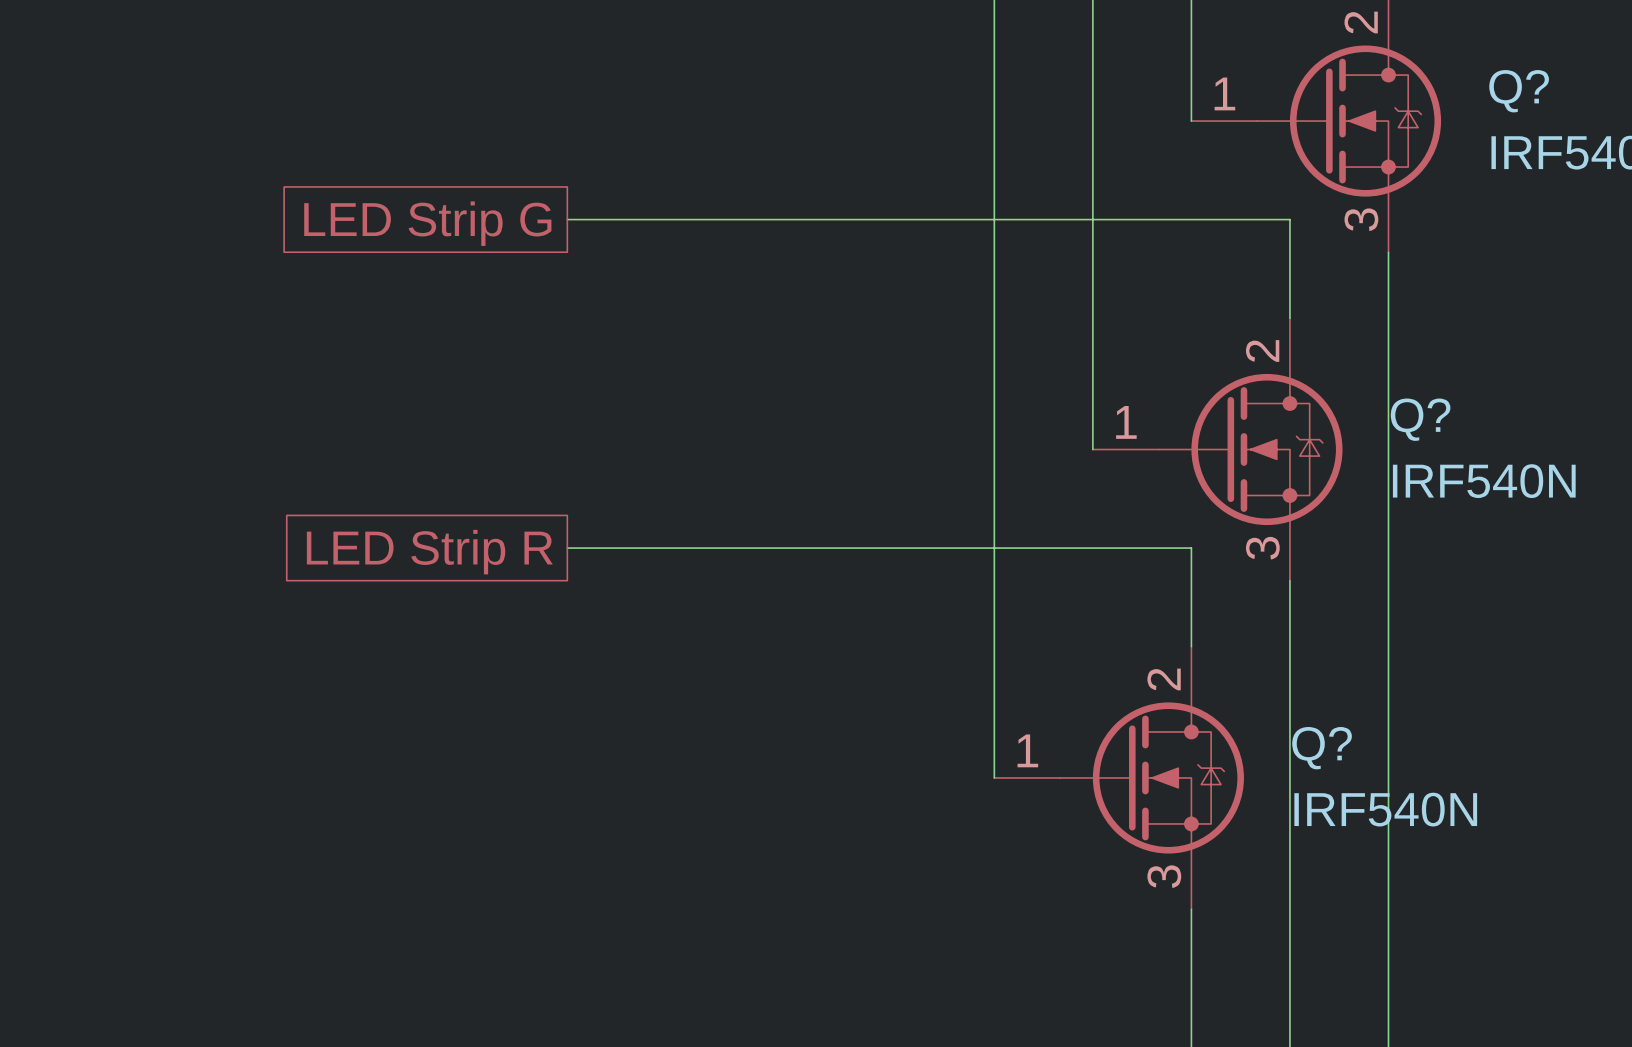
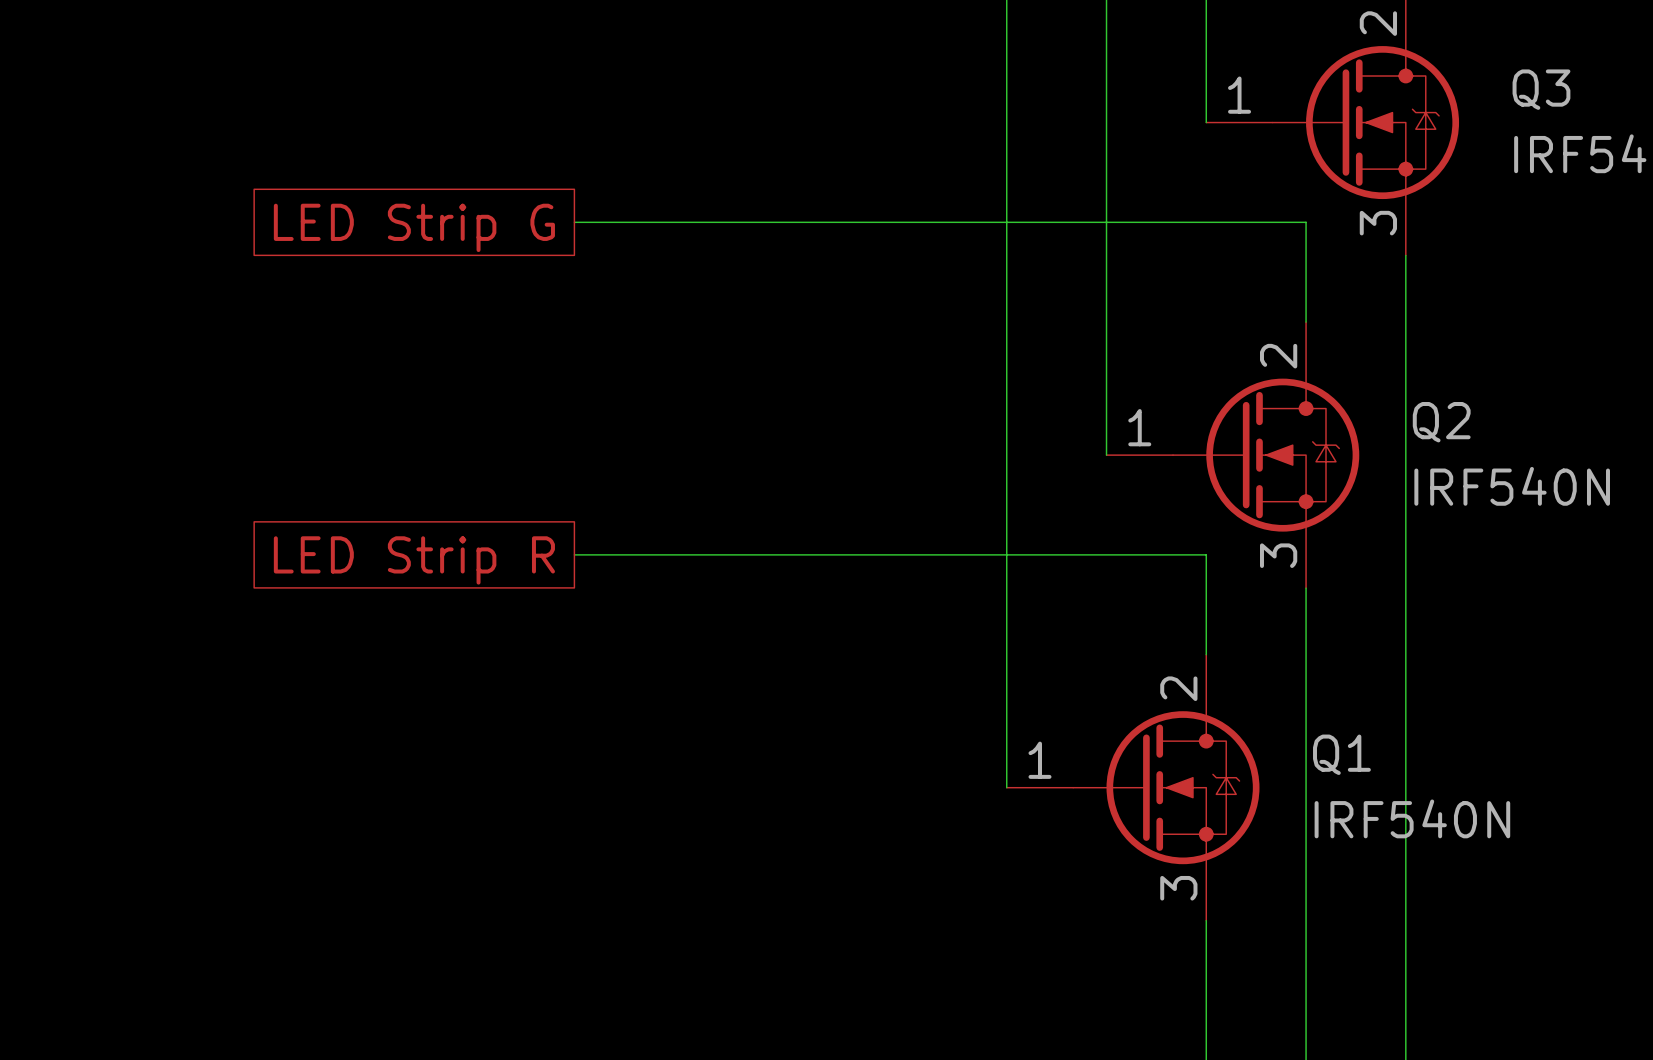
Q? name: Q? (1519, 91) -> Q3 (1541, 89)
Q? name: Q? (1420, 419) -> Q2 (1441, 422)
Q? name: Q? (1322, 748) -> Q1 (1341, 754)

